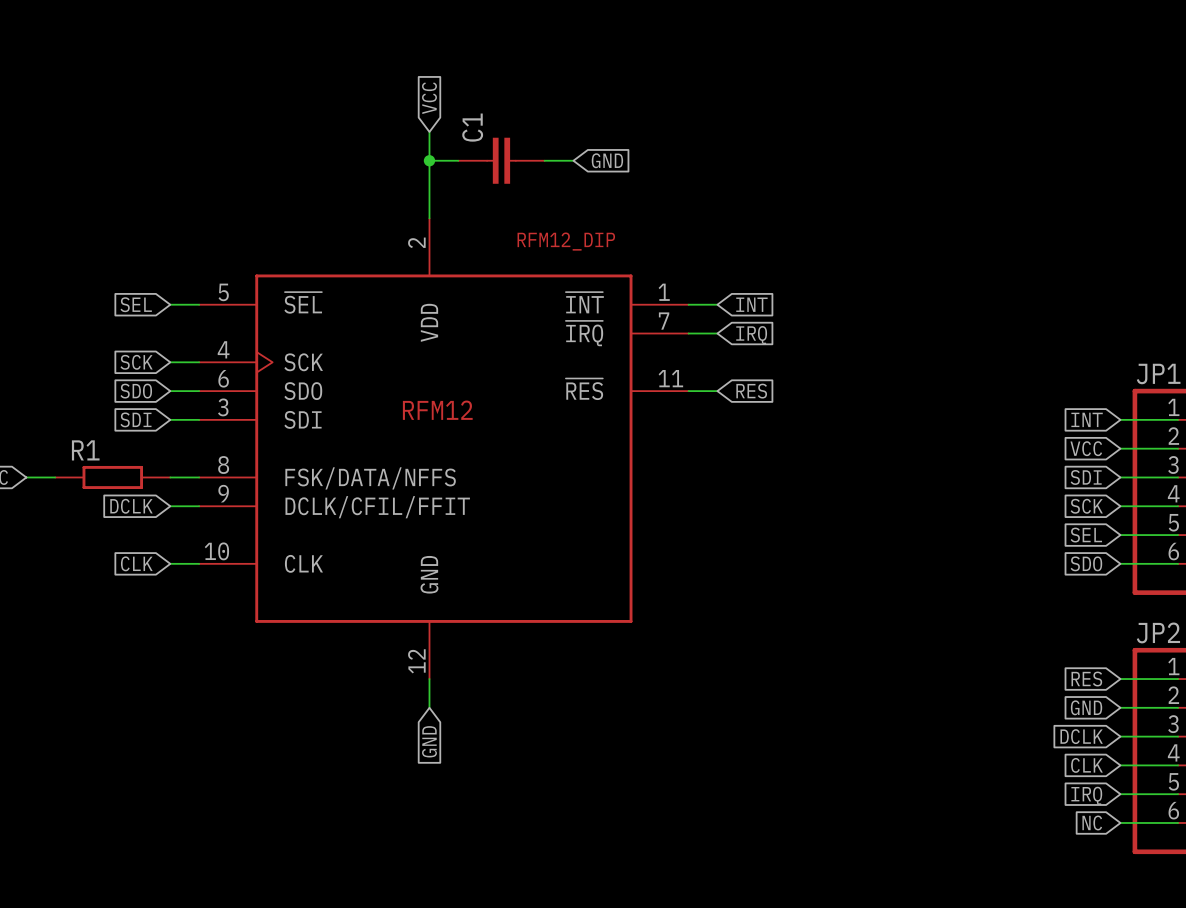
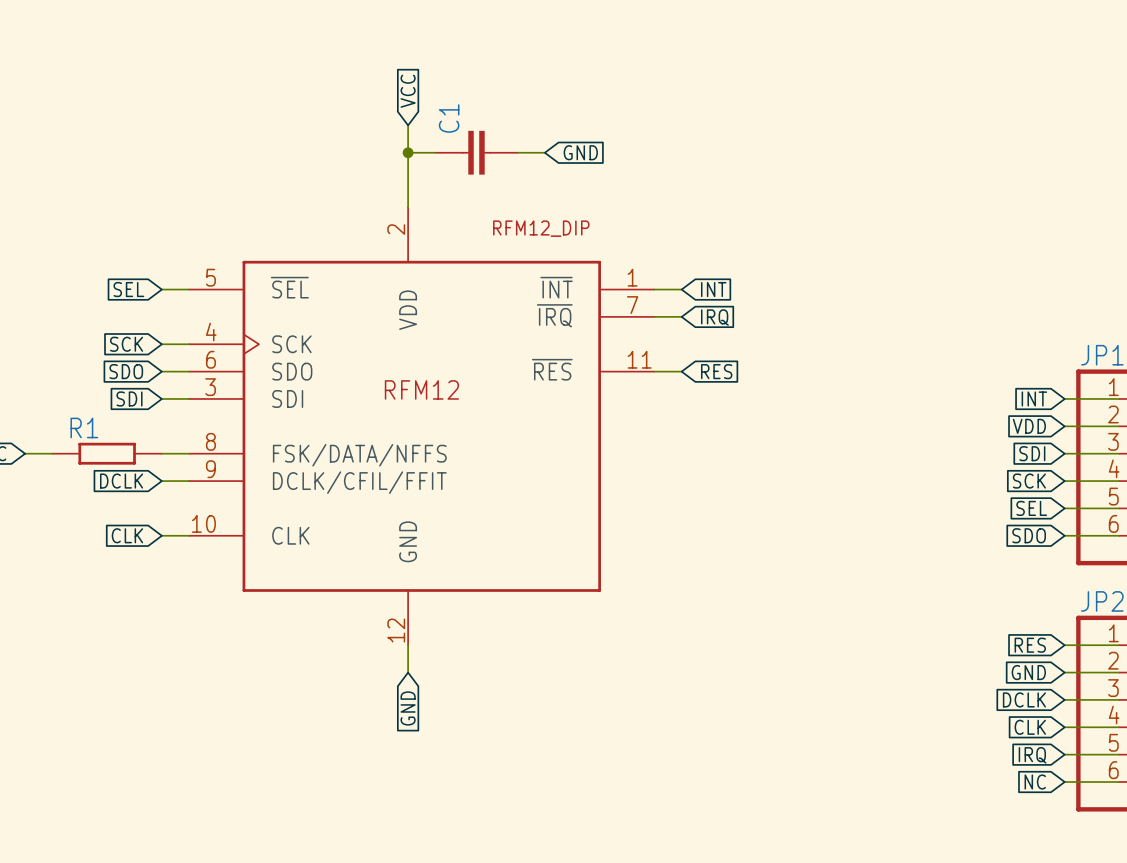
global label: VCC (1086, 448) -> VDD (1029, 426)

